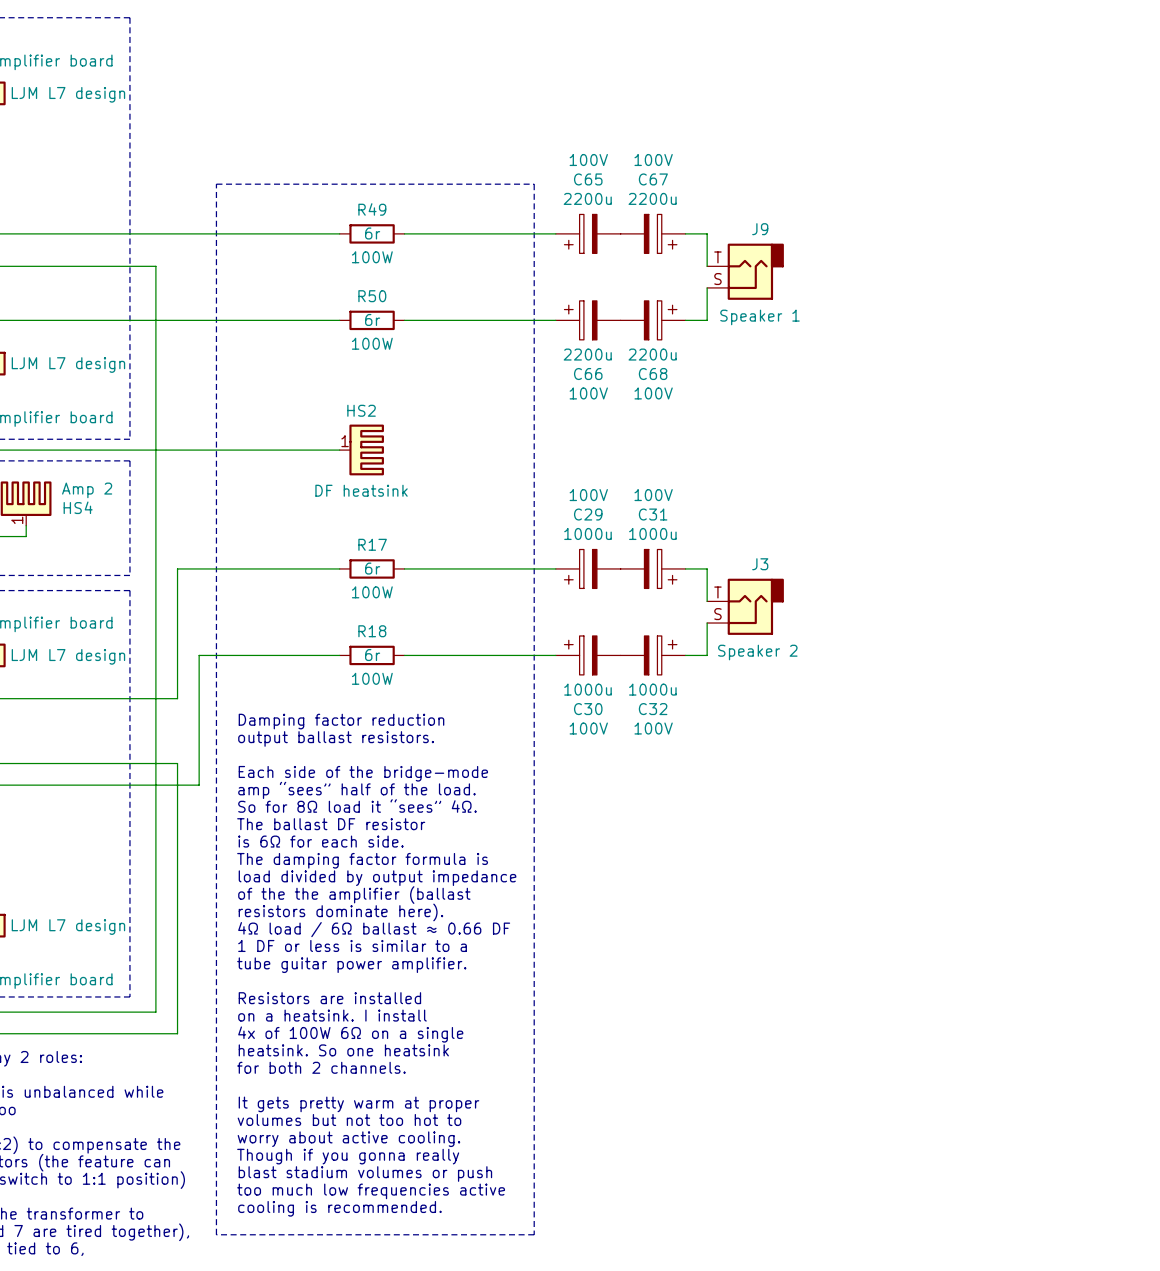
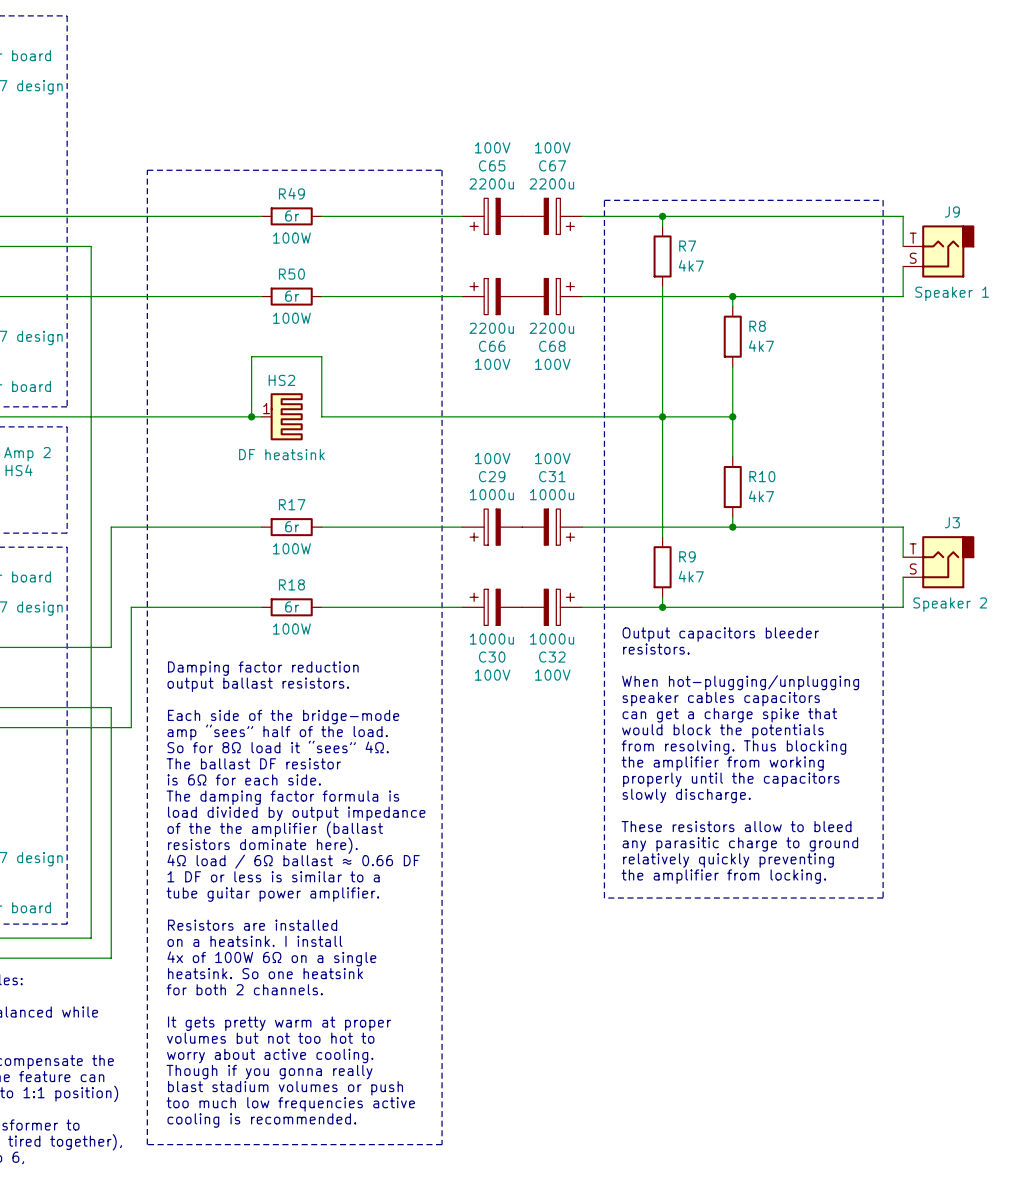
line: none -> (604, 200) (883, 200) (883, 898) (604, 898) (604, 200)
wire: (707, 233) (707, 266) -> (602, 216) (903, 216) (903, 246)
wire: none -> (662, 216) (662, 226)
junction: none -> (662, 216)
J9 position: (745, 271) -> (938, 251)
R7: none -> 4k7 (662, 256)
wire: (707, 287) (707, 320) -> (903, 266) (903, 296) (602, 296)
wire: none -> (662, 286) (662, 537)
wire: none -> (732, 296) (732, 306)
junction: none -> (732, 296)
R8: none -> 4k7 (732, 336)
wire: none -> (732, 366) (732, 456)
wire: none -> (251, 416) (251, 356) (321, 356) (321, 416) (732, 416)
junction: none -> (251, 416)
junction: none -> (662, 416)
junction: none -> (732, 416)
R10: none -> 4k7 (732, 487)
wire: none -> (732, 517) (732, 527)
wire: (707, 568) (707, 601) -> (602, 527) (903, 527) (903, 557)
junction: none -> (732, 527)
J3 position: (745, 606) -> (938, 562)
R9: none -> 4k7 (662, 567)
wire: (707, 623) (707, 655) -> (903, 577) (903, 607) (602, 607)
wire: none -> (662, 597) (662, 607)
junction: none -> (662, 607)
text: none -> Output capacitors bleeder (720, 634)
text: none -> resistors. (656, 649)
text: none -> When hot-plugging/unplugging (740, 682)
text: none -> speaker cables capacitors (721, 699)
text: none -> can get a charge spike that (729, 715)
text: none -> would block the potentials (722, 731)
text: none -> from resolving. Thus blocking (733, 747)
text: none -> the amplifier from working (722, 763)
text: none -> properly until the capacitors (731, 779)
text: none -> slowly discharge. (686, 795)
text: none -> These resistors allow to bleed (736, 826)
text: none -> any parasitic charge to ground (740, 844)
text: none -> relatively quickly preventing (728, 860)
text: none -> the amplifier from locking. (723, 876)

